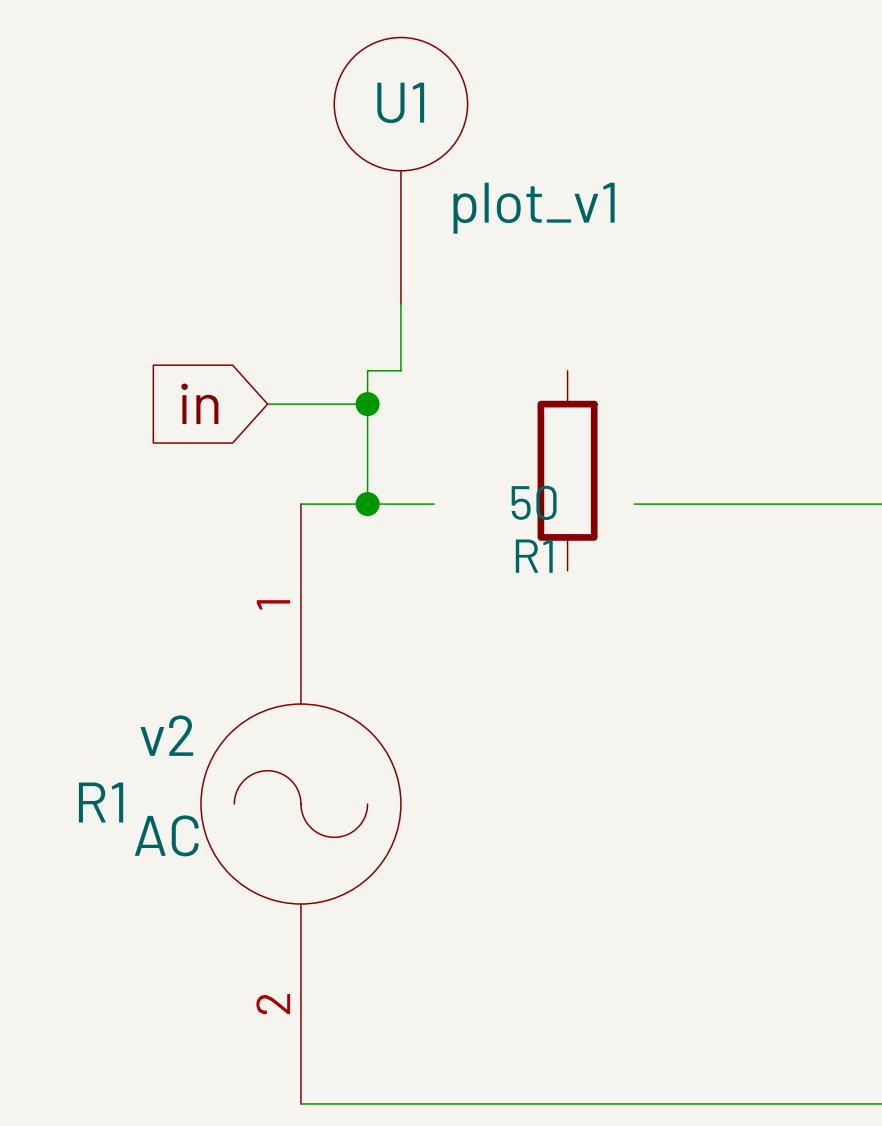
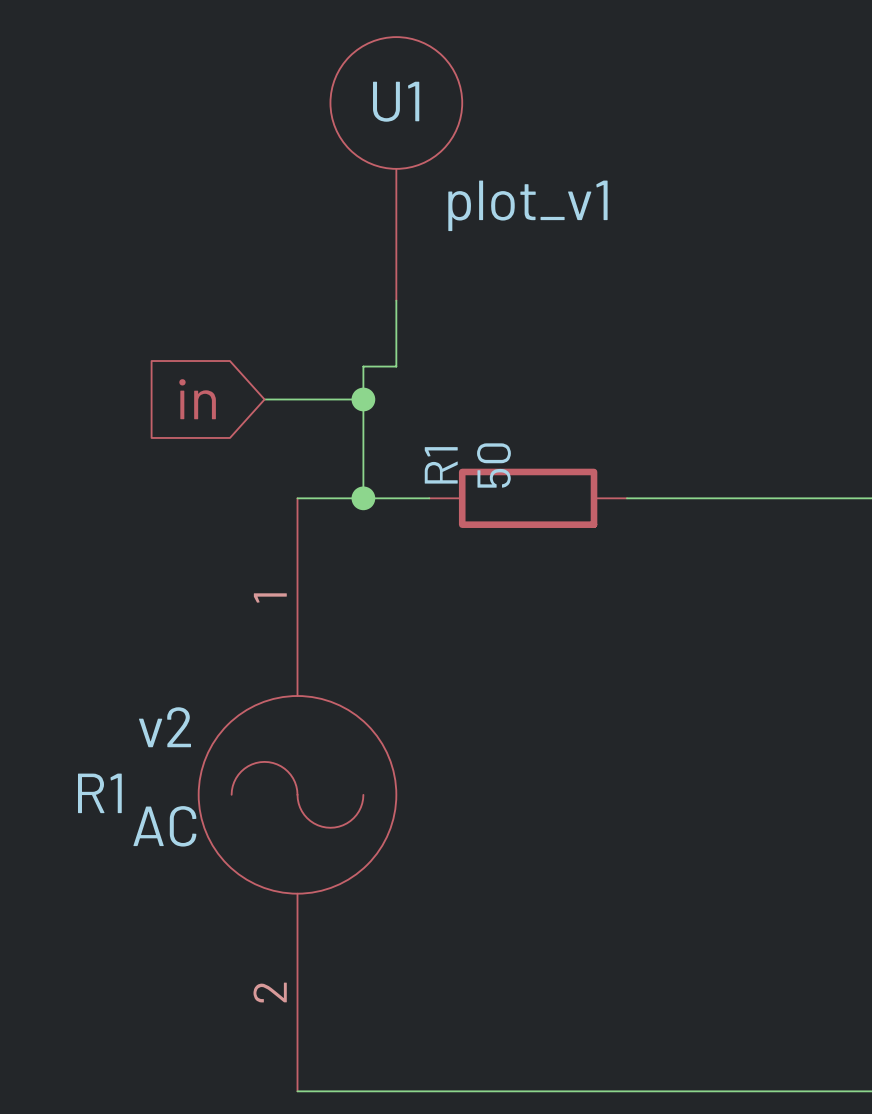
R1 rotation: 0° (567, 470) -> 90° clockwise (528, 498)

